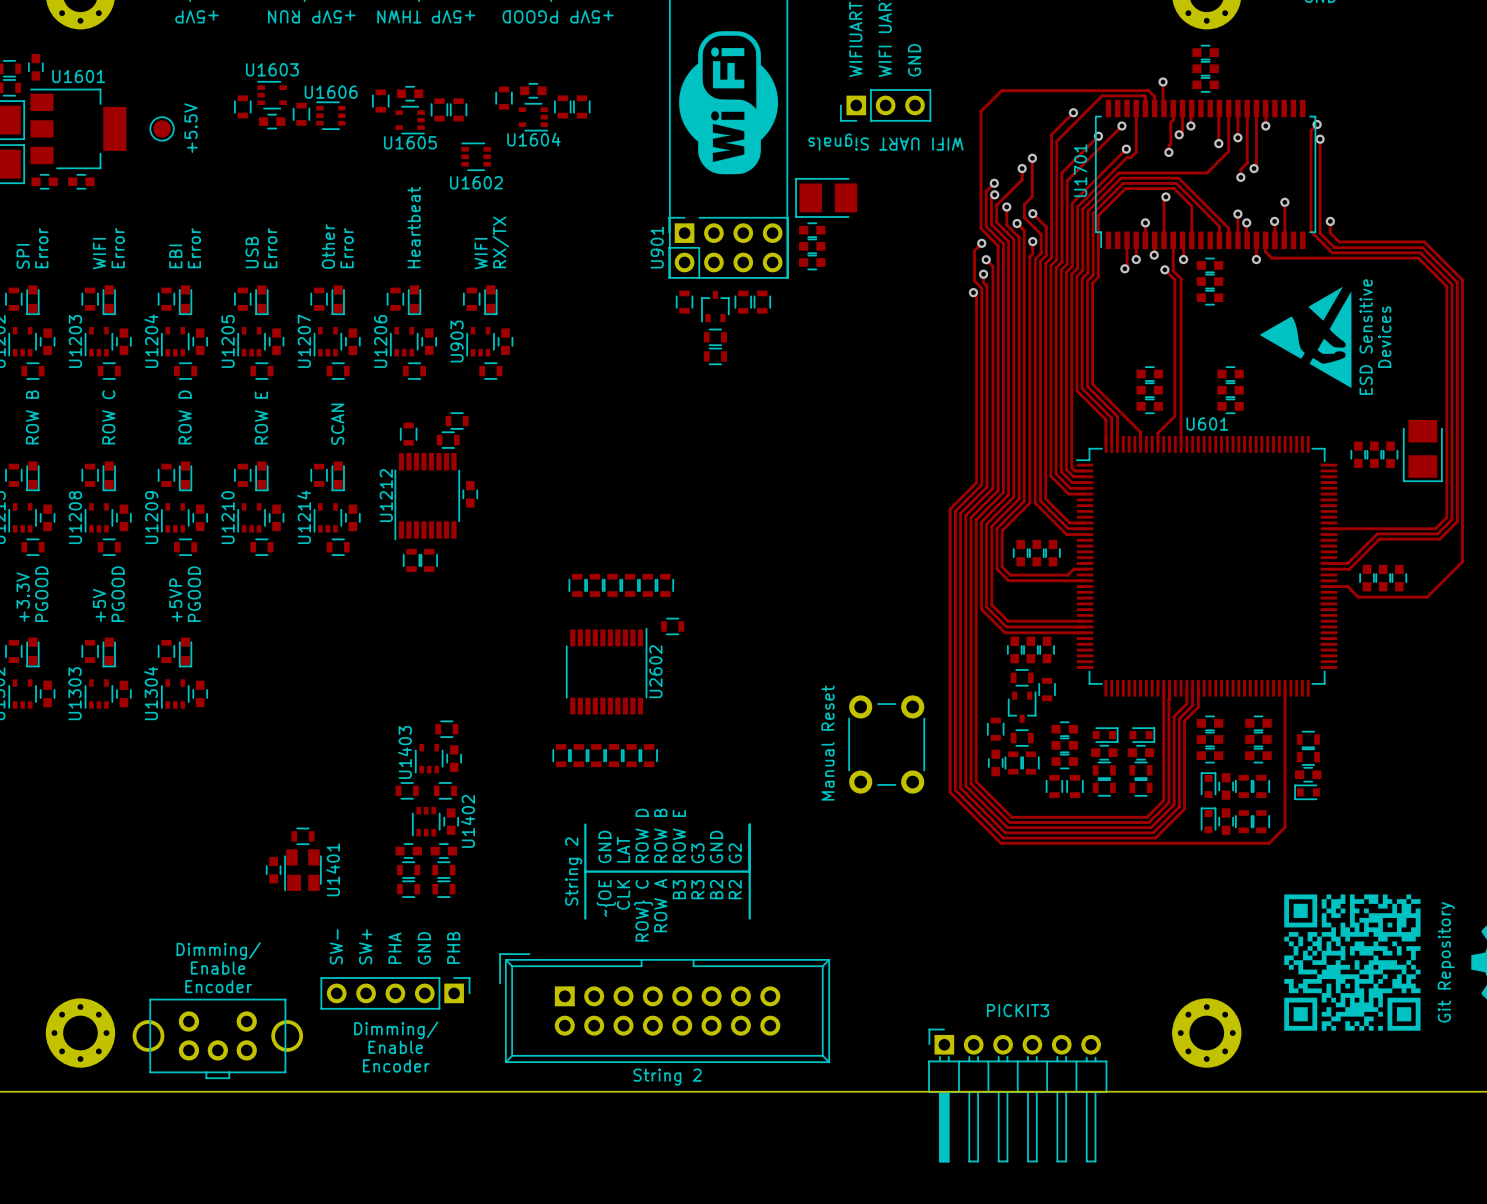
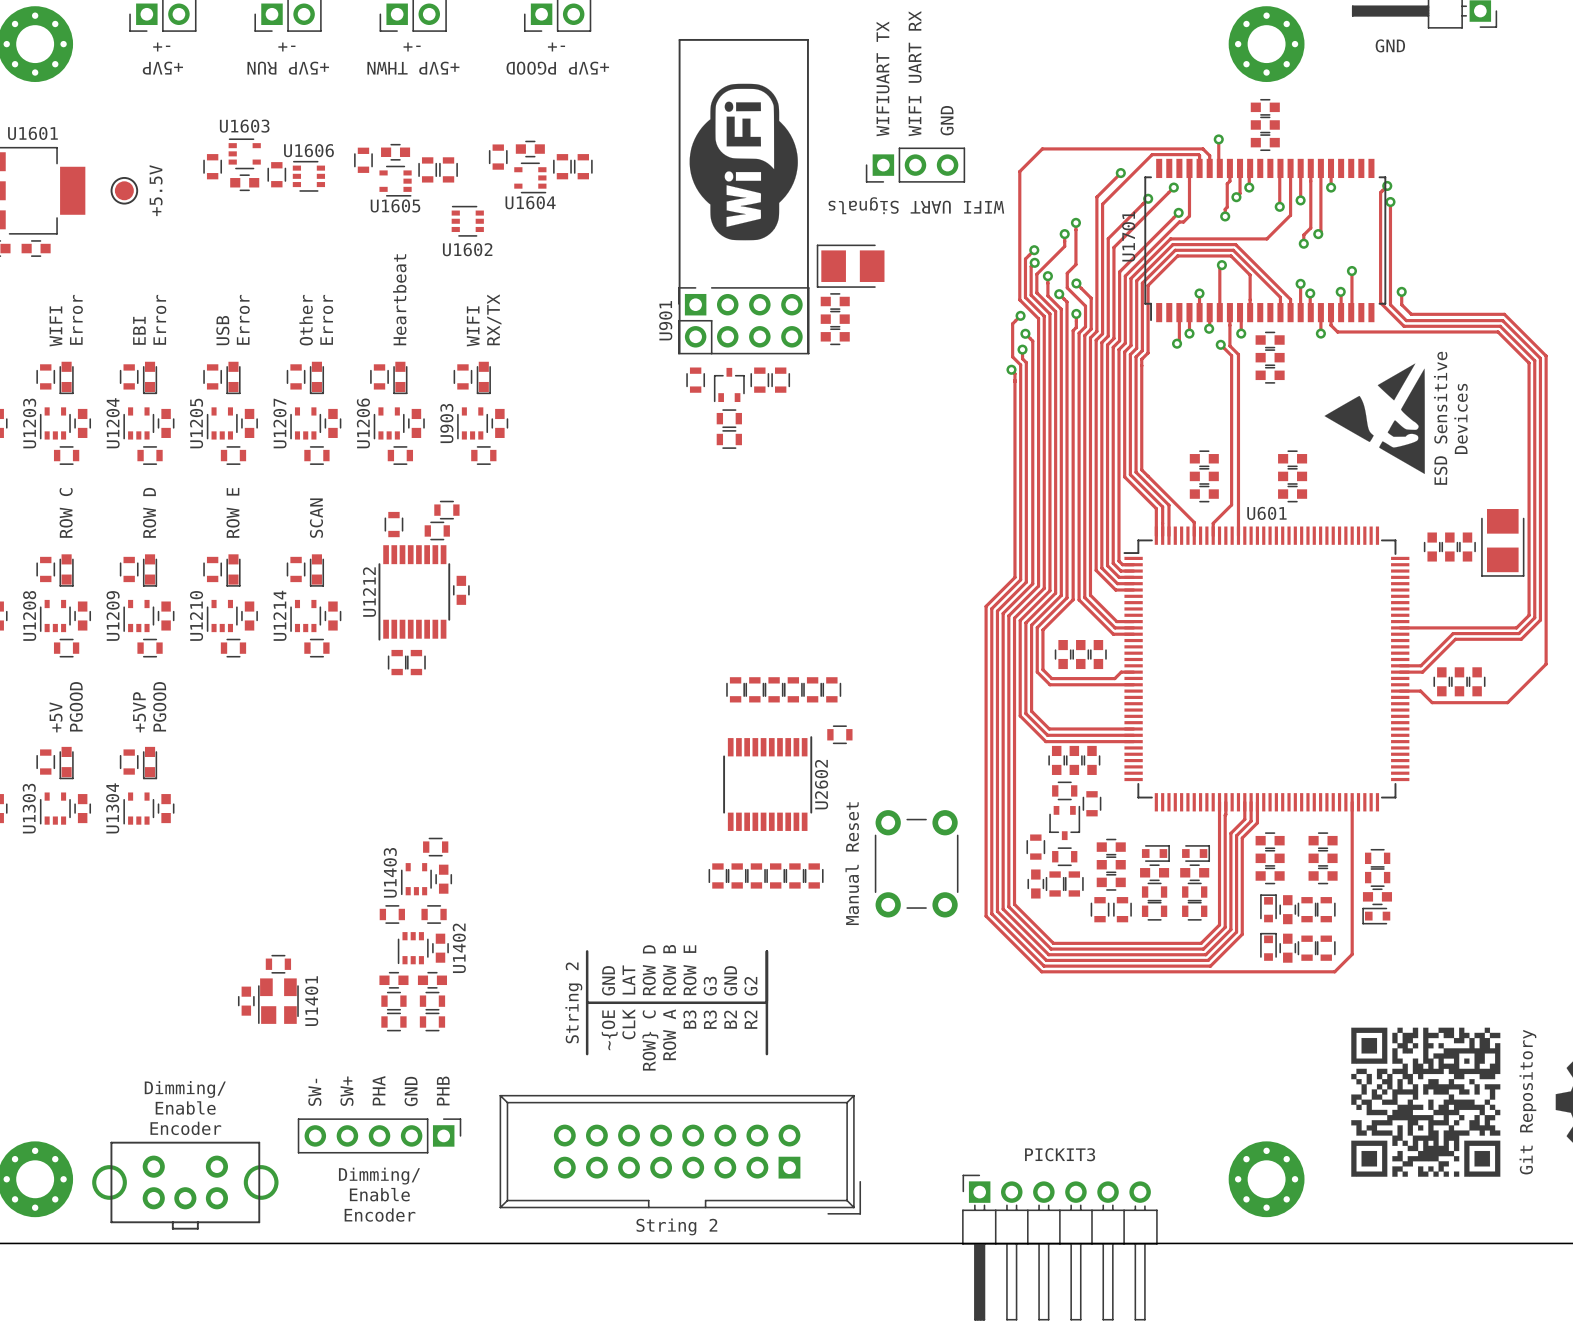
part: (577, 585) -> none
part: (594, 585) -> none
part: (612, 585) -> none
part: (630, 585) -> none
part: (647, 585) -> none
part: (665, 585) -> none
part: none -> (735, 689)
part: none -> (754, 689)
part: none -> (774, 689)
part: none -> (793, 689)
part: none -> (812, 689)
part: none -> (831, 689)
part: (672, 626) -> none
part: none -> (839, 734)
U2602 position: (606, 671) -> (767, 783)
part: (561, 755) -> none
part: (578, 755) -> none
part: (596, 755) -> none
part: (613, 755) -> none
part: (631, 755) -> none
part: (649, 755) -> none
part: none -> (717, 875)
part: none -> (737, 875)
part: none -> (756, 875)
part: none -> (775, 875)
part: none -> (794, 875)
part: none -> (814, 875)
part rotation: 0° (664, 1008) -> 180° (680, 1154)

